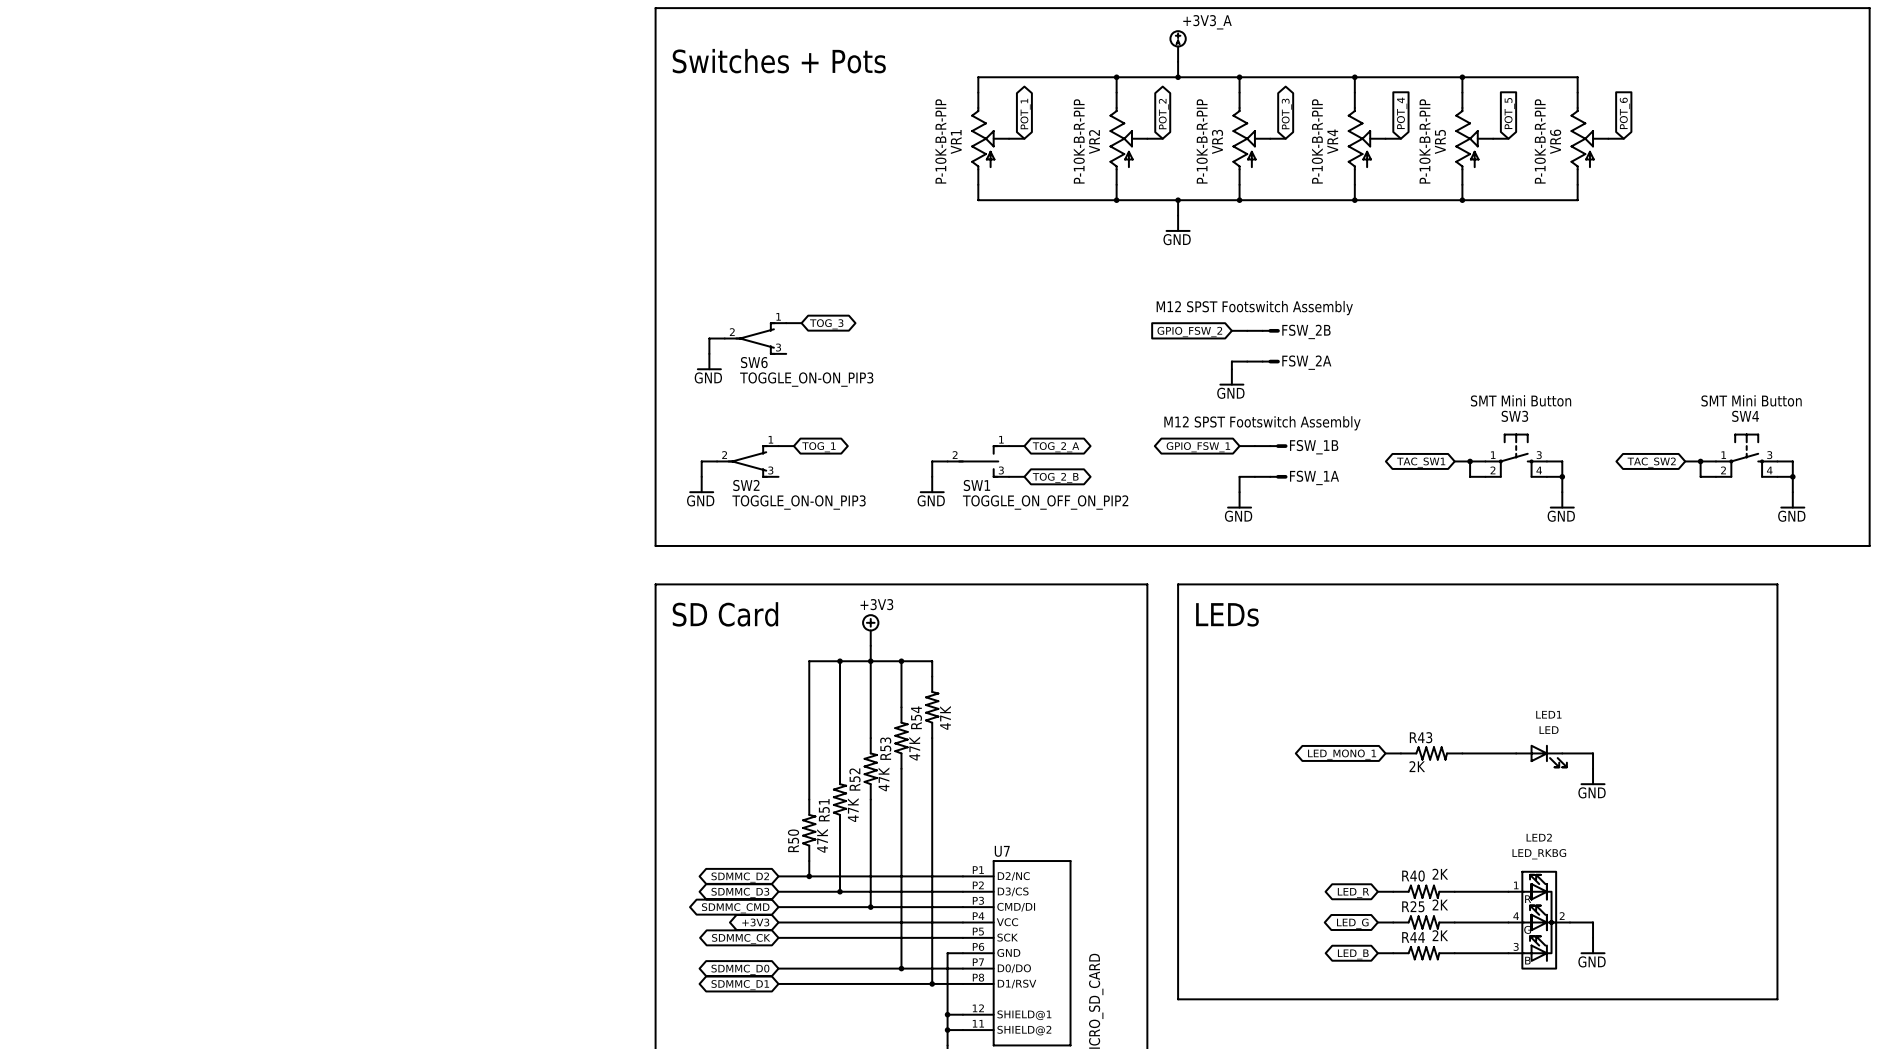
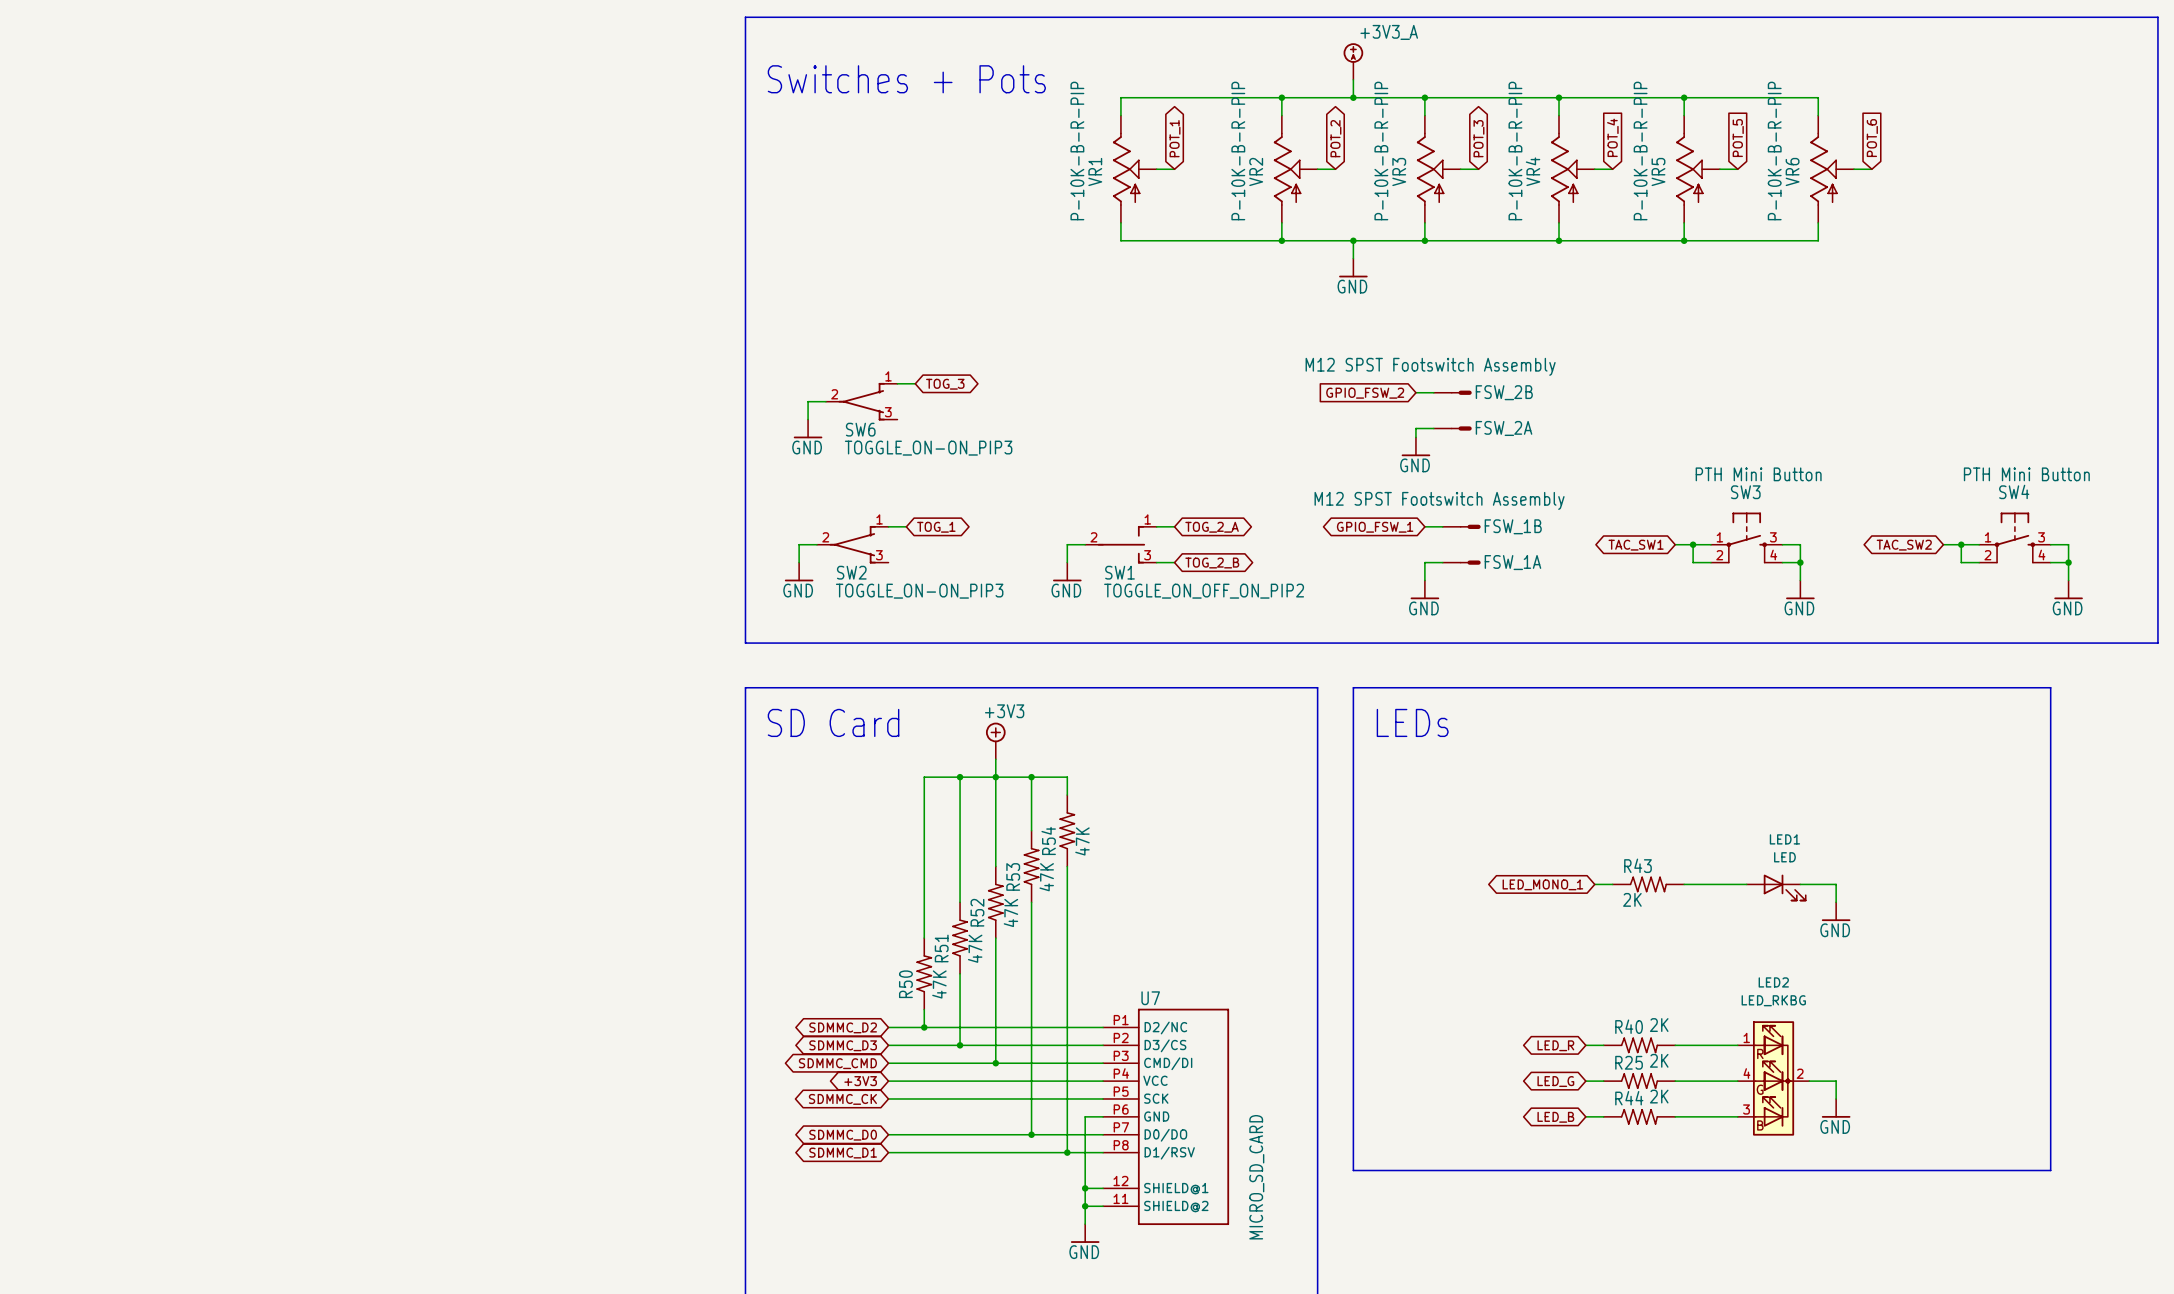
SW3 value: SMT Mini Button (1521, 400) -> PTH Mini Button (1758, 474)
SW4 value: SMT Mini Button (1751, 400) -> PTH Mini Button (2026, 474)

